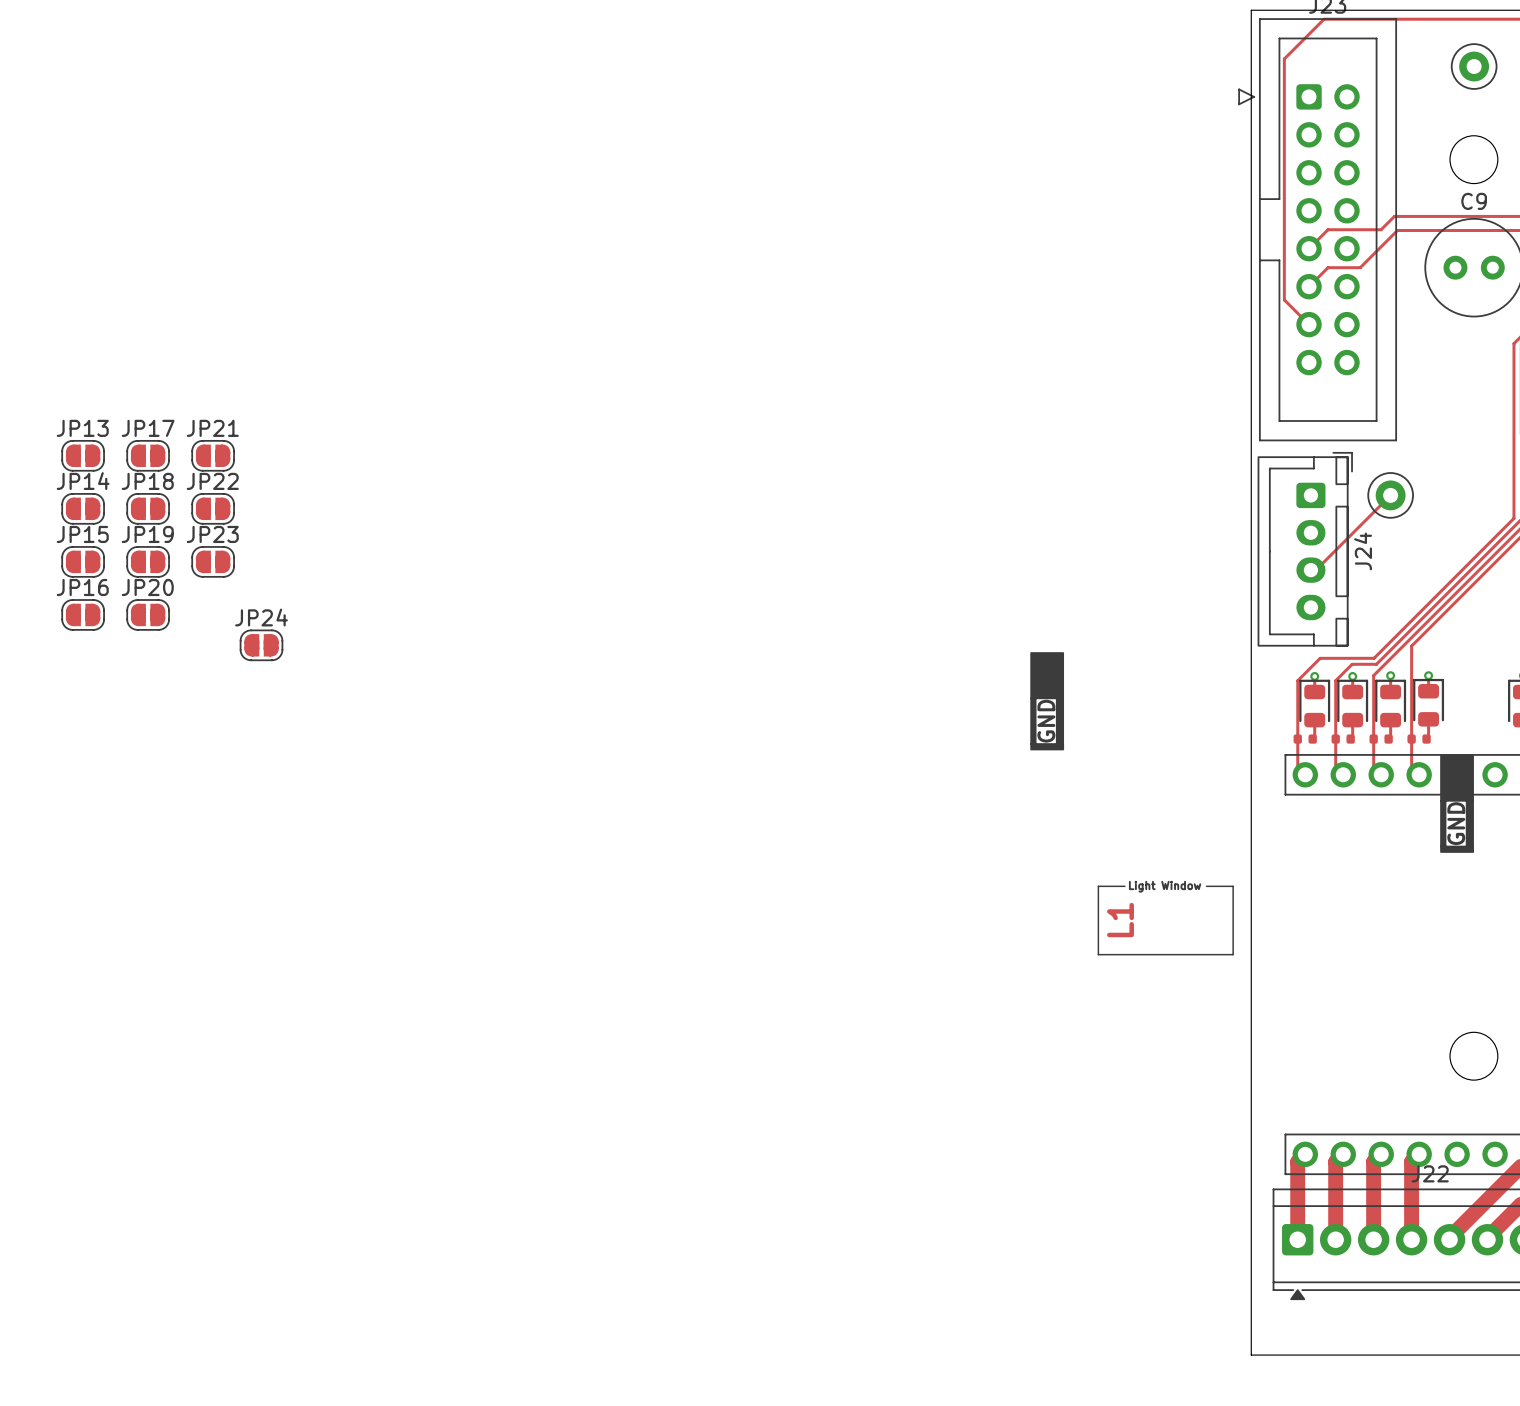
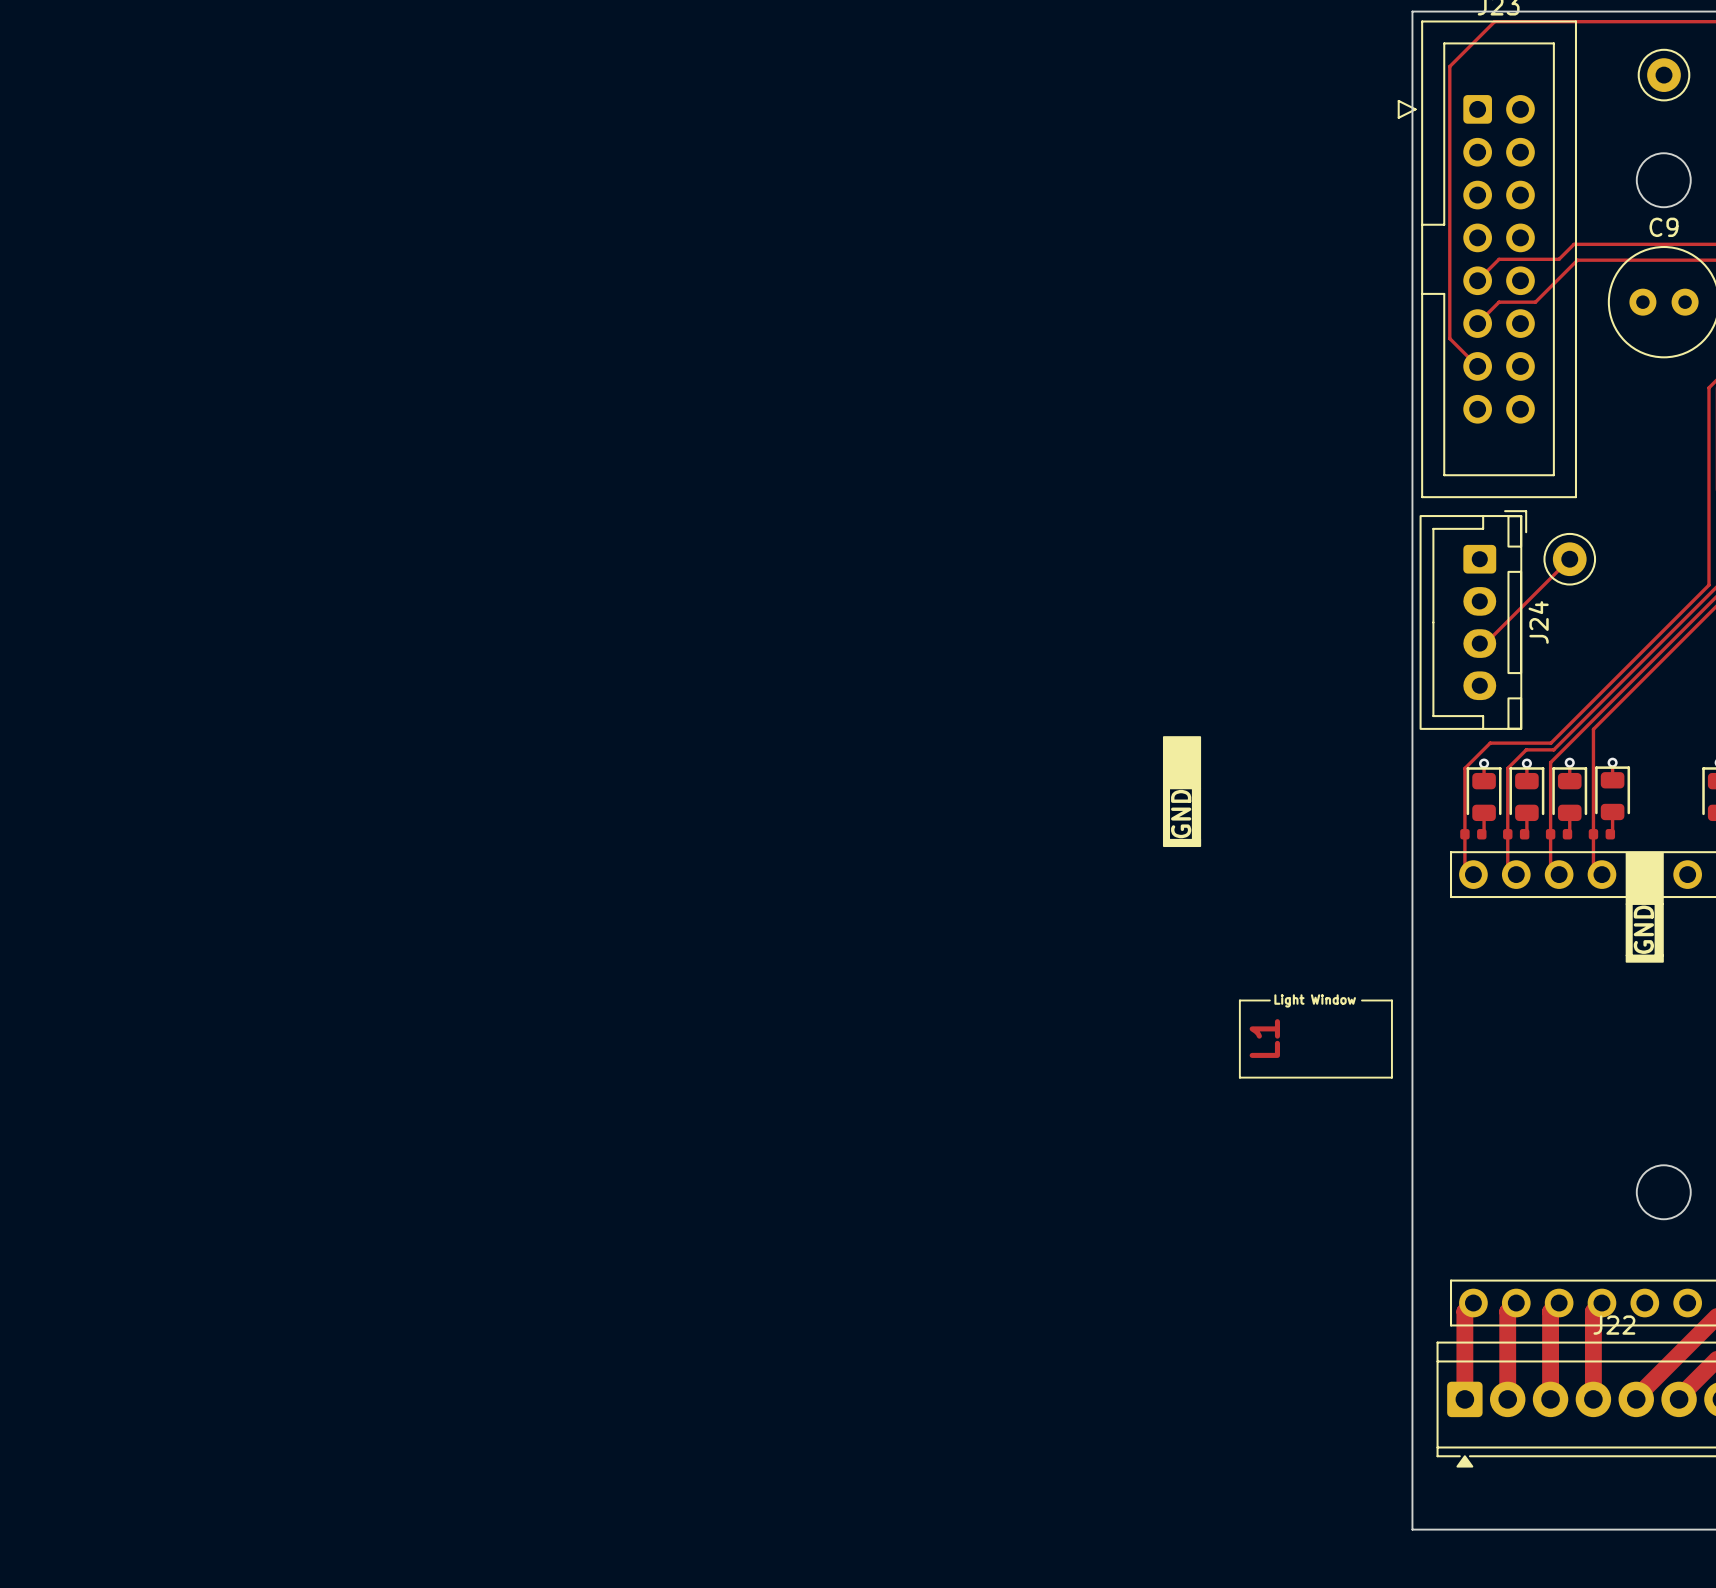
JP13: (83, 455) -> none
JP17: (148, 455) -> none
JP21: (213, 455) -> none
JP14: (83, 508) -> none
JP18: (148, 508) -> none
JP22: (213, 508) -> none
JP15: (83, 561) -> none
JP19: (148, 561) -> none
JP23: (213, 561) -> none
JP16: (83, 614) -> none
JP20: (148, 614) -> none
JP24: (261, 645) -> none

